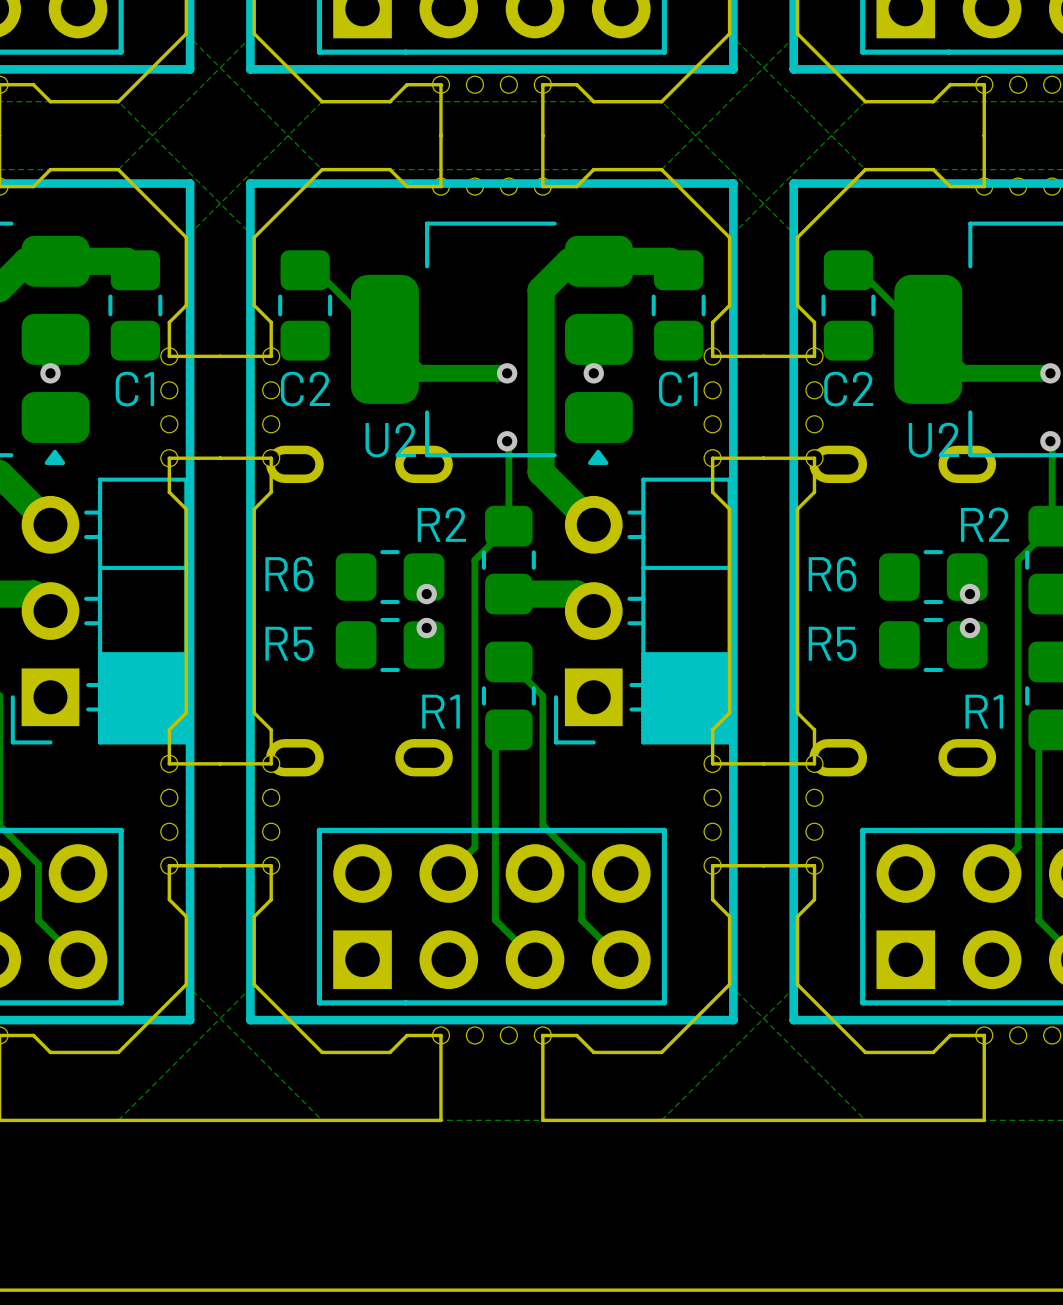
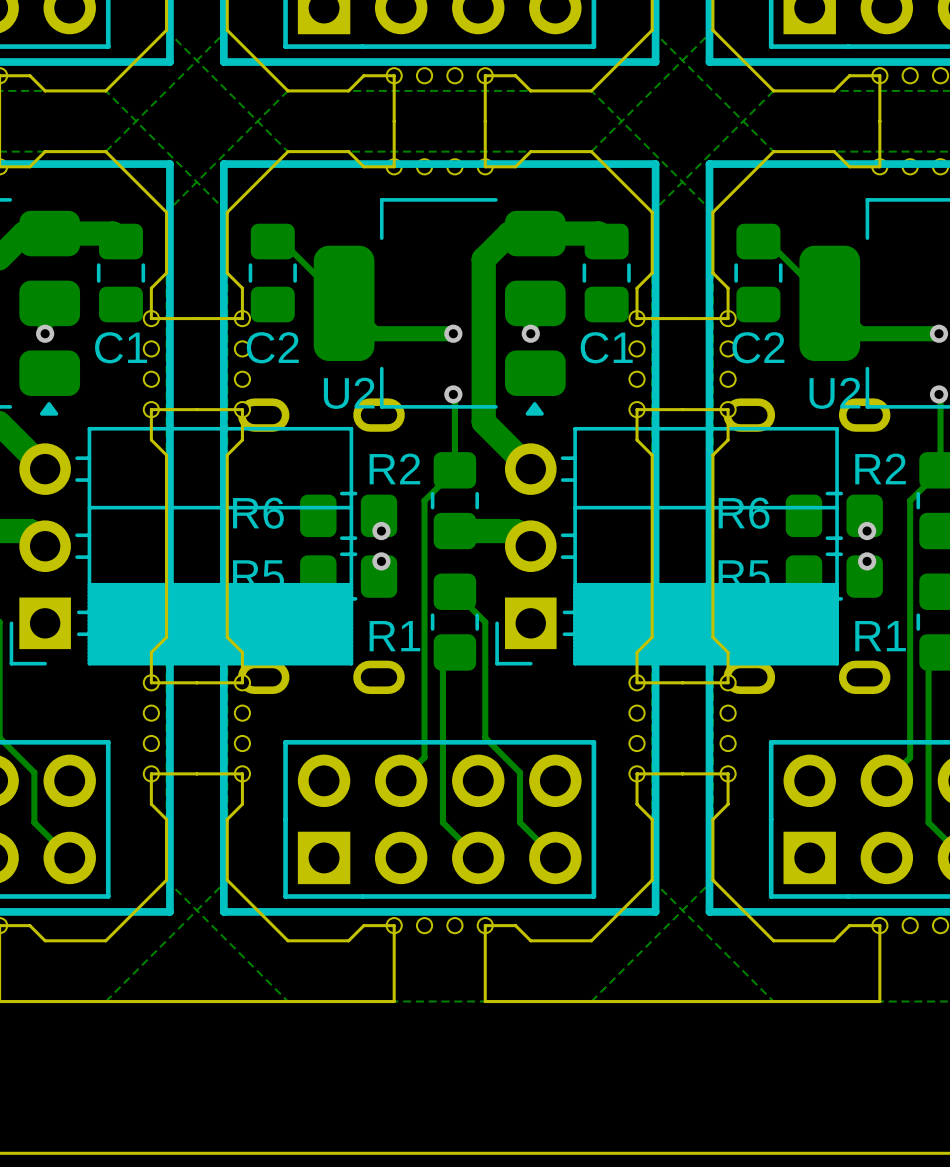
part: (99, 611) -> none
part: none -> (181, 546)
part: (642, 611) -> none
part: none -> (667, 546)

